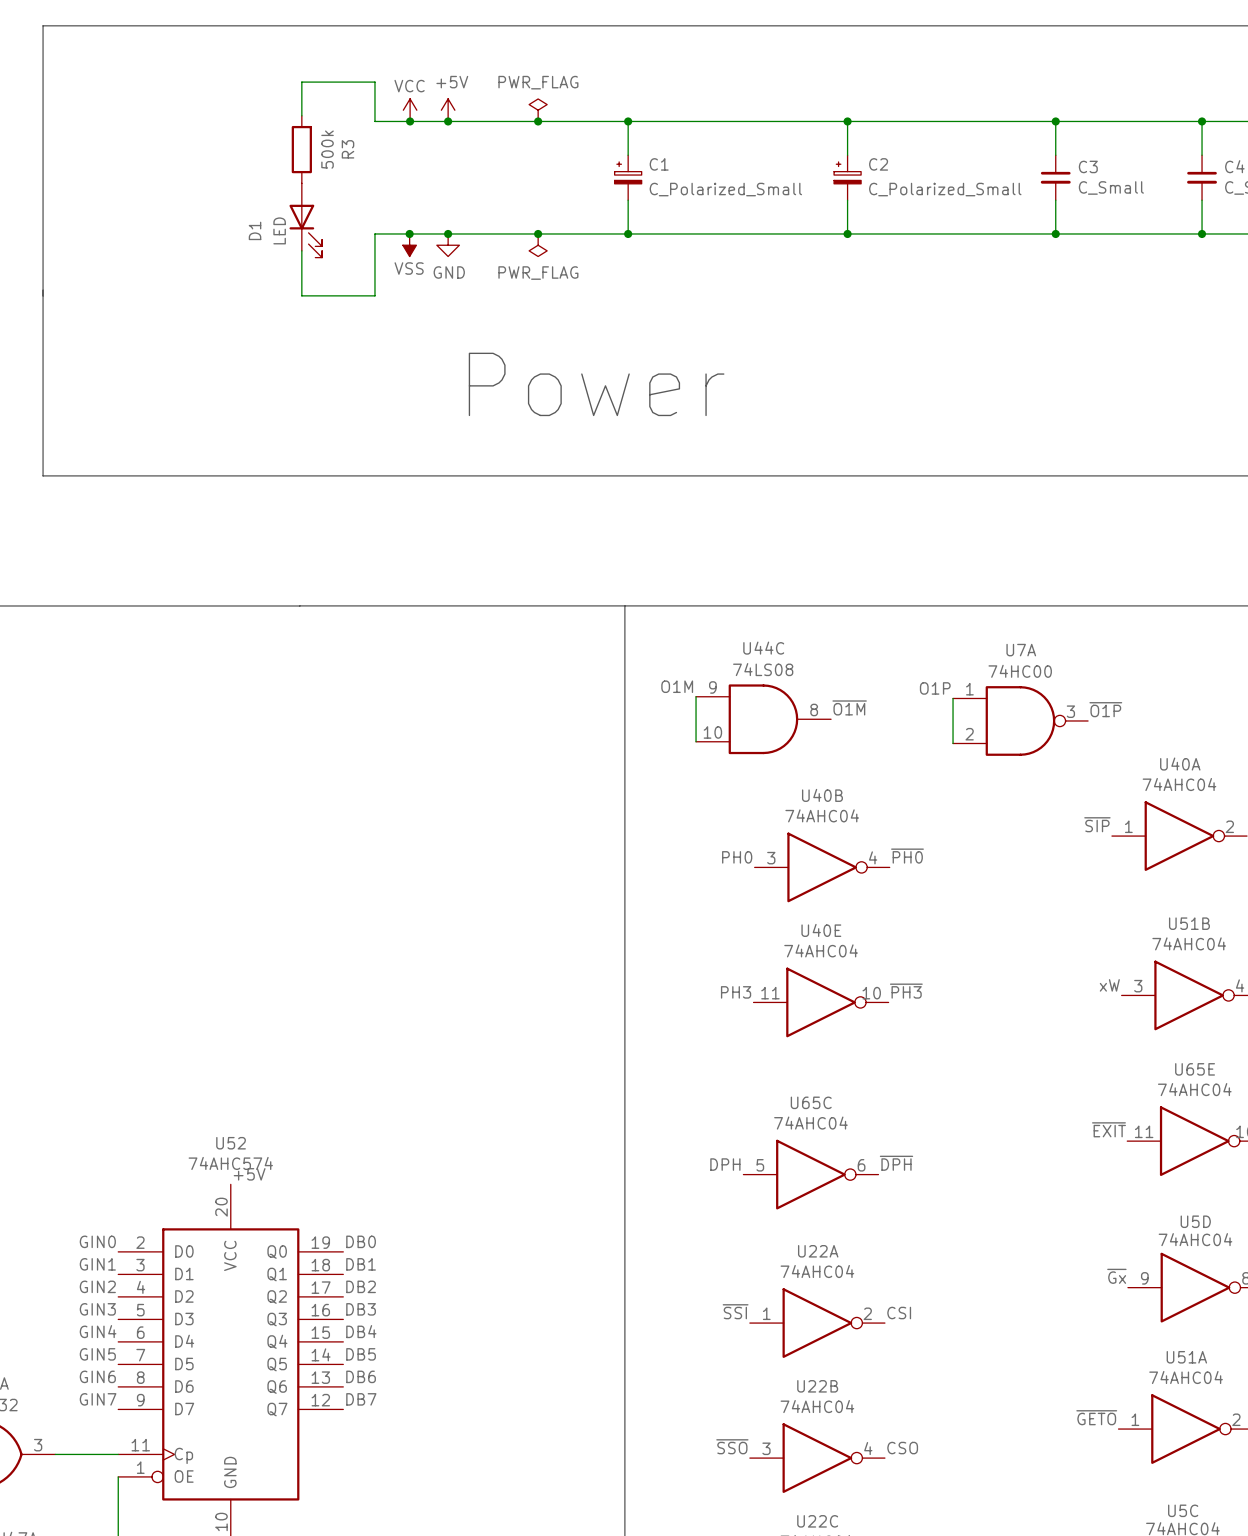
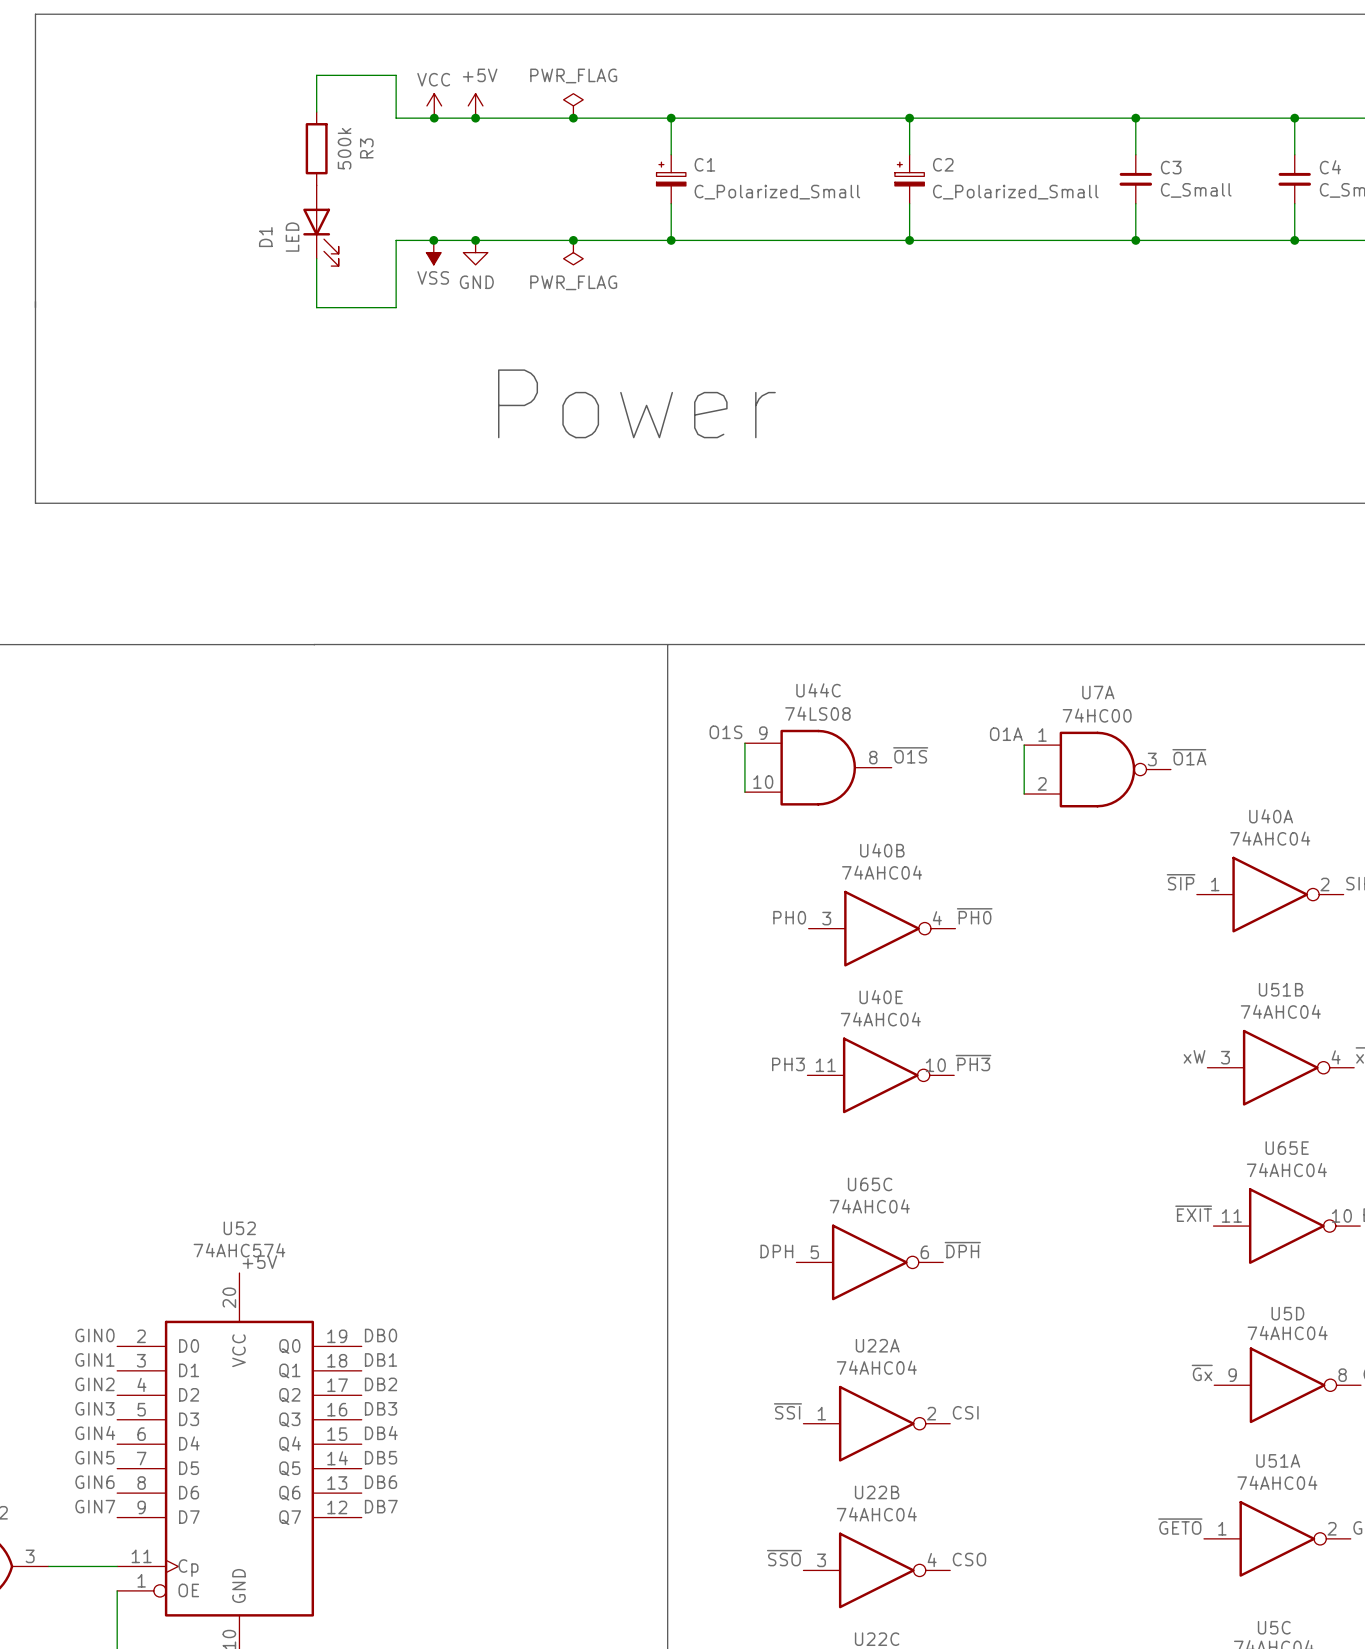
label: O1M (677, 686) -> O1S (725, 732)
label: O1P (935, 688) -> O1A (1006, 734)
label: ~{O1M} (849, 707) -> ~{O1S} (910, 755)
label: ~{O1P} (1105, 709) -> ~{O1A} (1189, 757)

